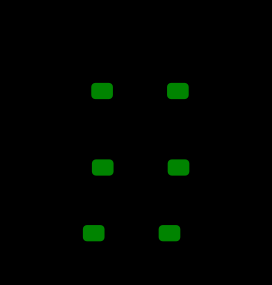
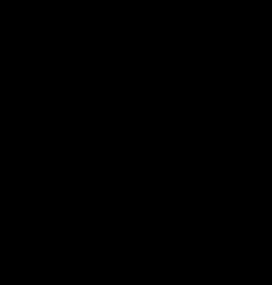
part: (139, 90) -> none
part: (140, 167) -> none
part: (131, 233) -> none

